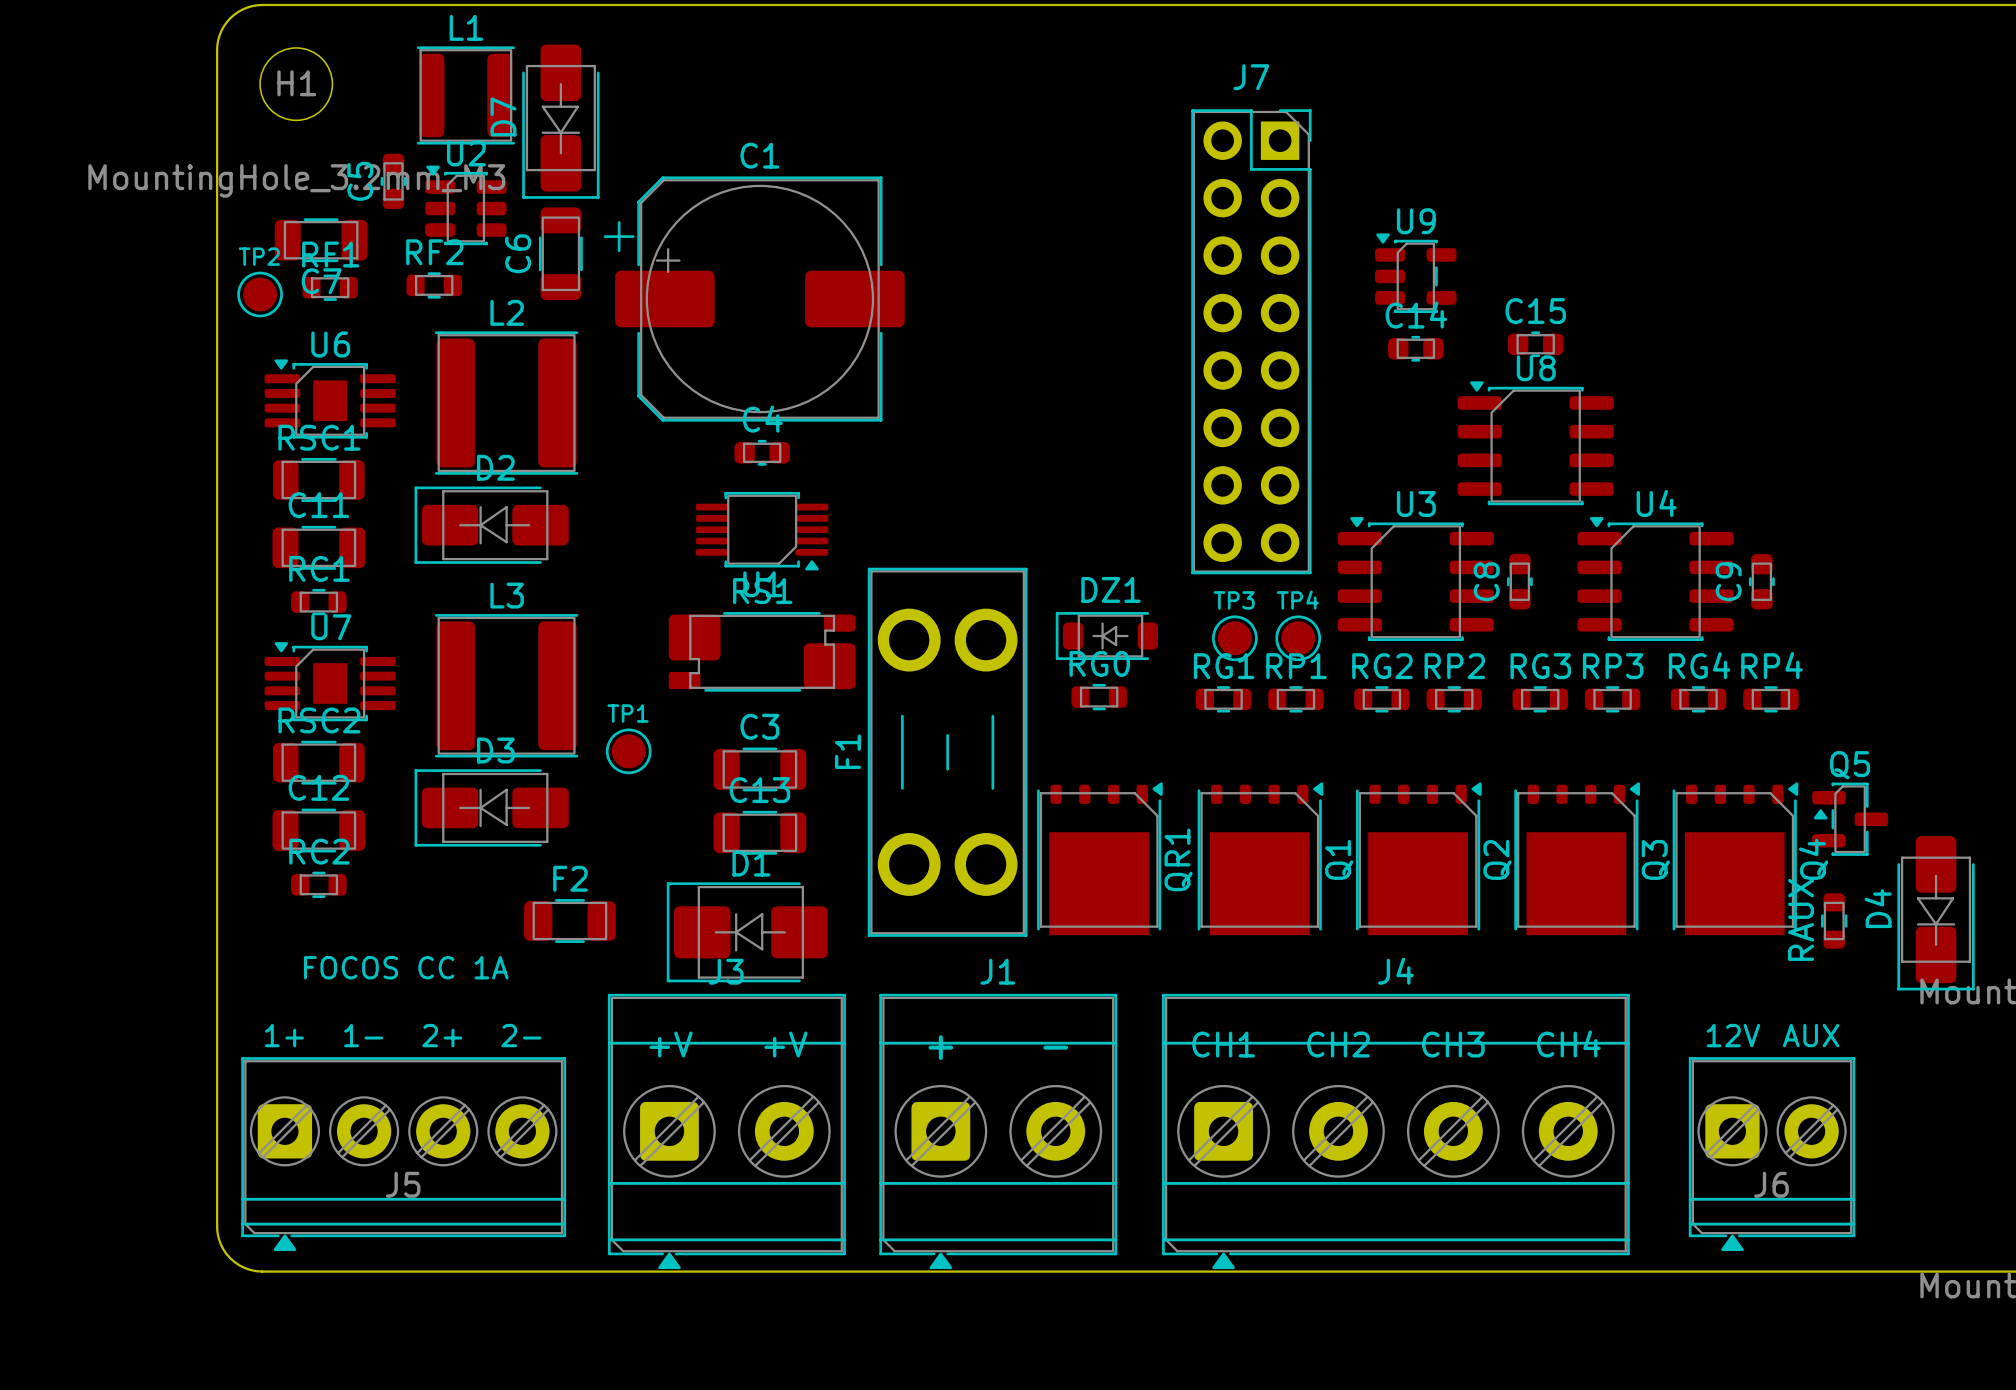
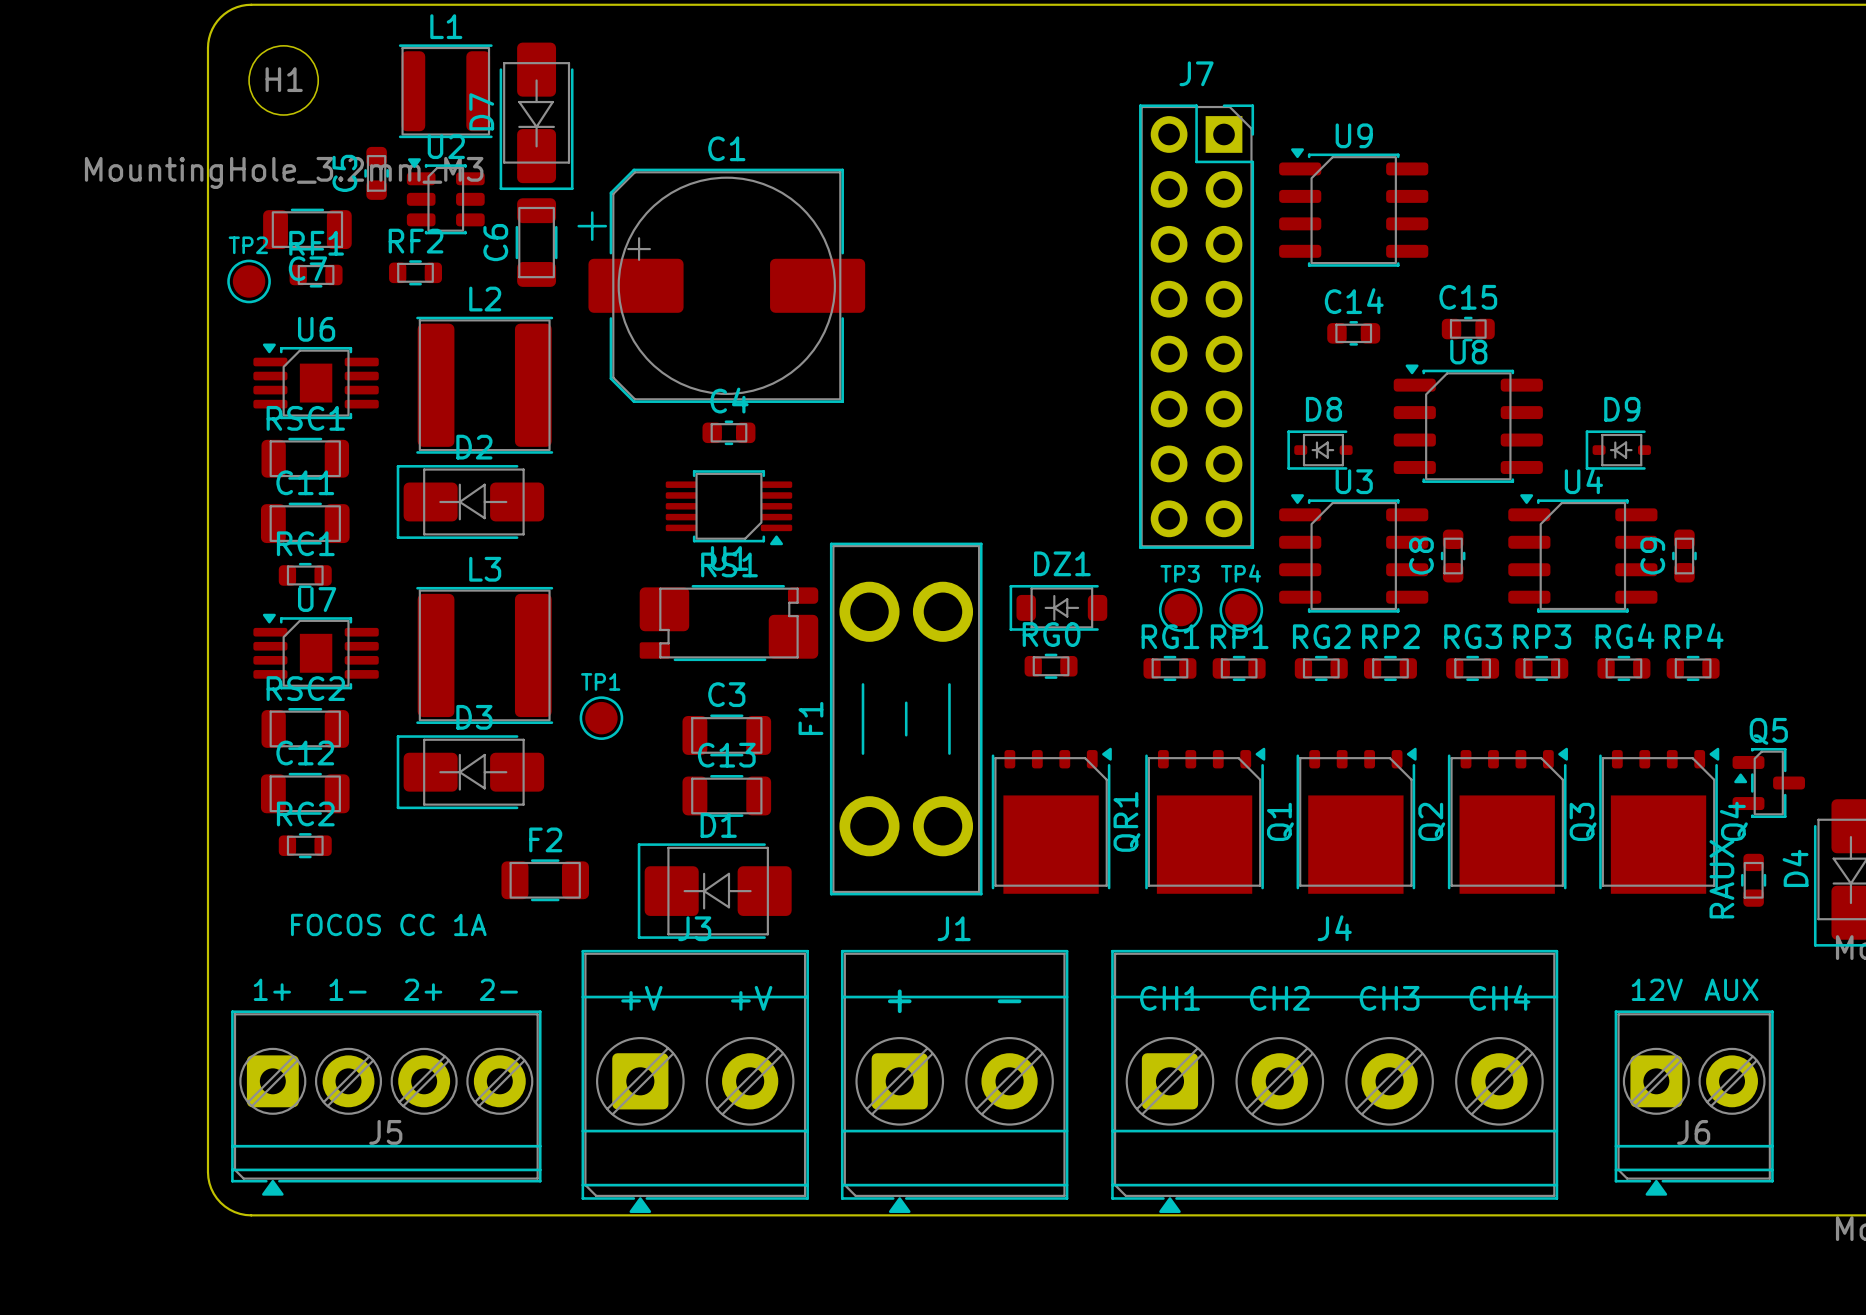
U9 footprint: [1375, 233, 1457, 314] -> [1279, 148, 1429, 267]
D8: none -> (1319, 450)
D9: none -> (1618, 450)

